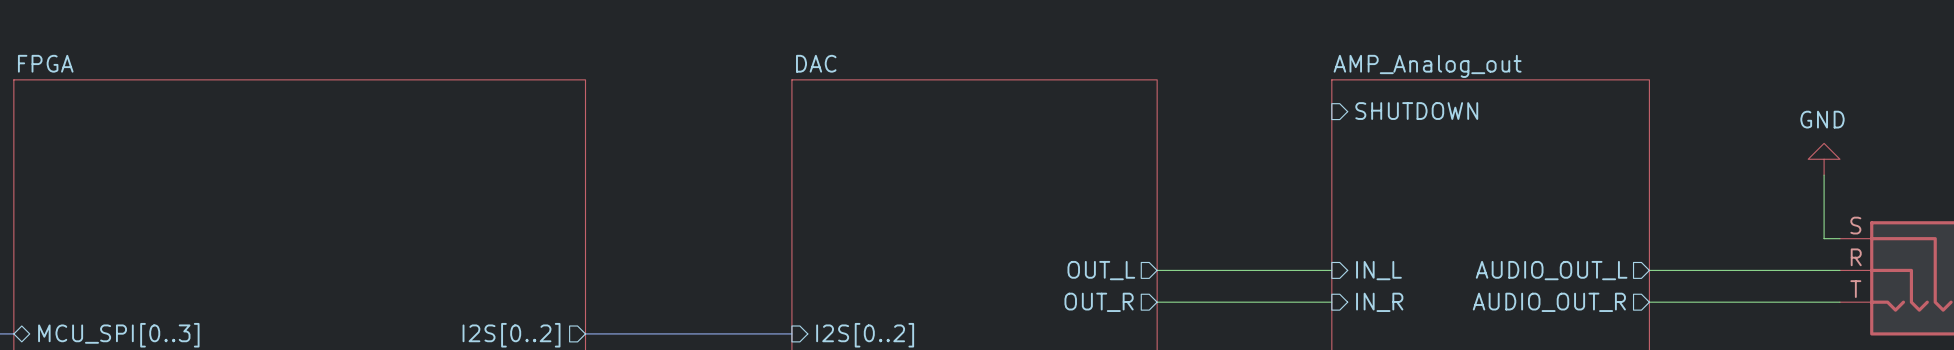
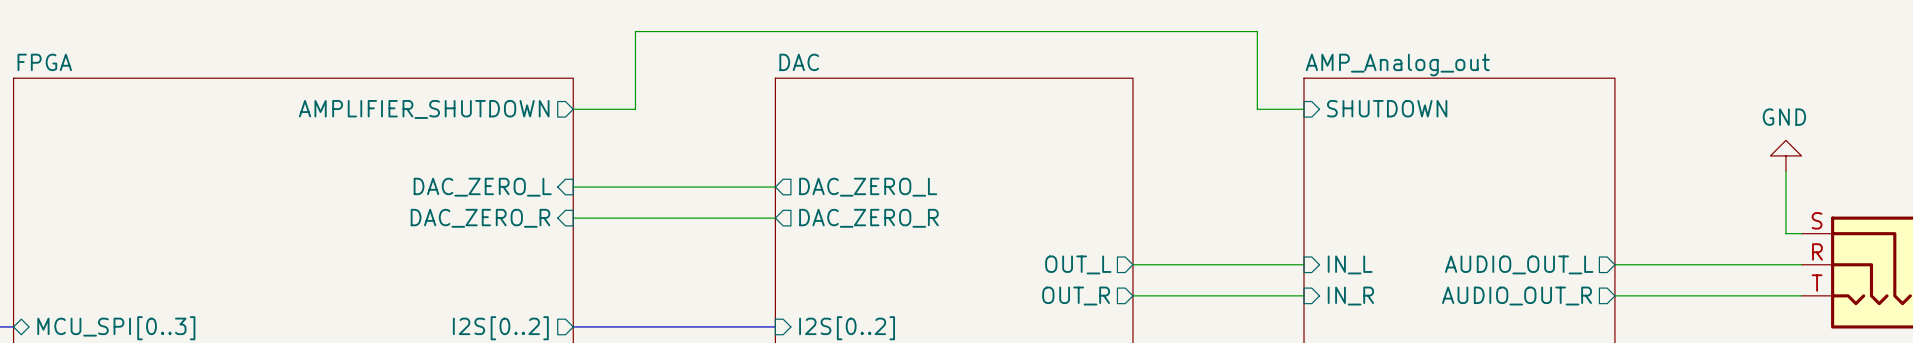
sheet pin: none -> AMPLIFIER_SHUTDOWN (424, 109)
wire: none -> (573, 109) (635, 109) (635, 31) (1257, 31) (1257, 109) (1304, 109)
sheet pin: none -> DAC_ZERO_L (482, 187)
wire: none -> (573, 187) (775, 187)
sheet pin: none -> DAC_ZERO_L (868, 187)
sheet pin: none -> DAC_ZERO_R (480, 218)
wire: none -> (573, 218) (775, 218)
sheet pin: none -> DAC_ZERO_R (868, 218)

